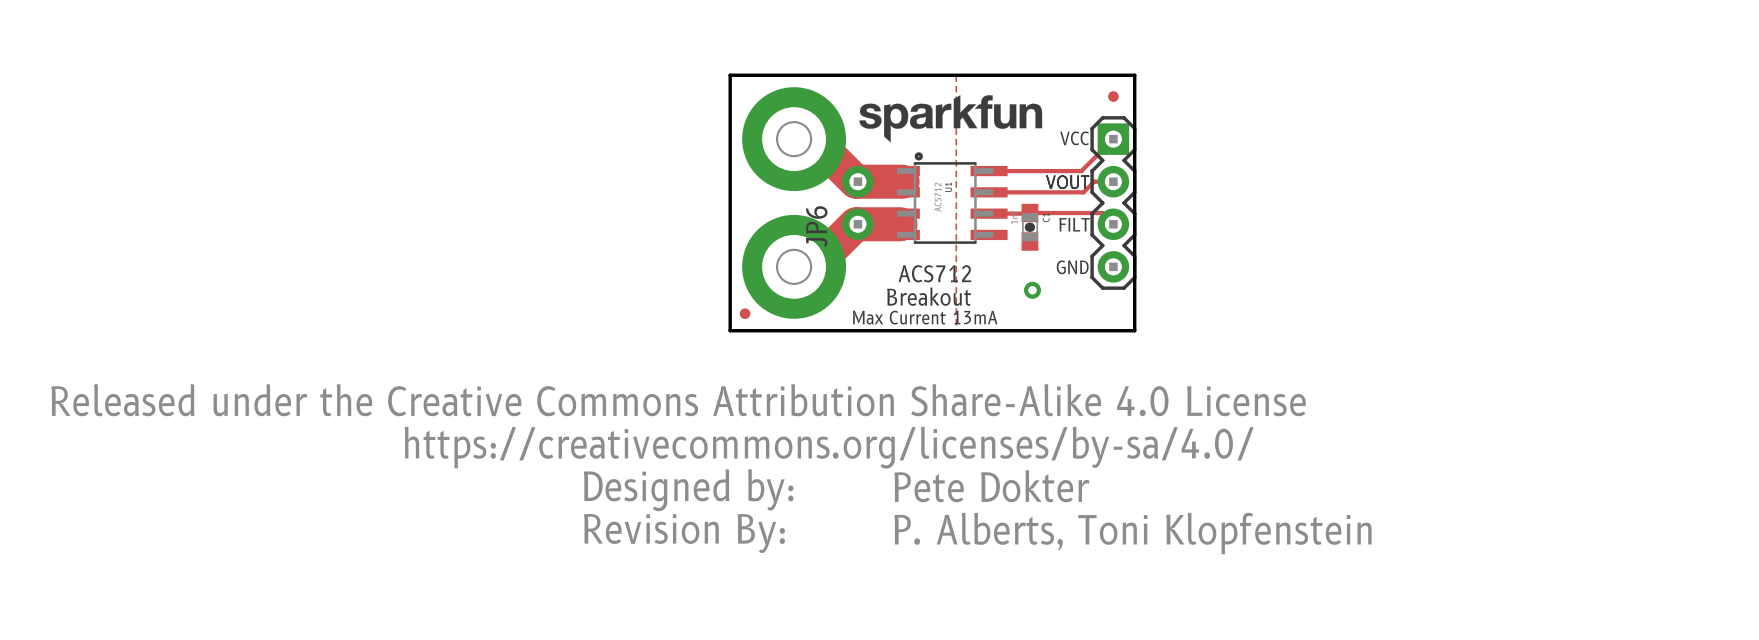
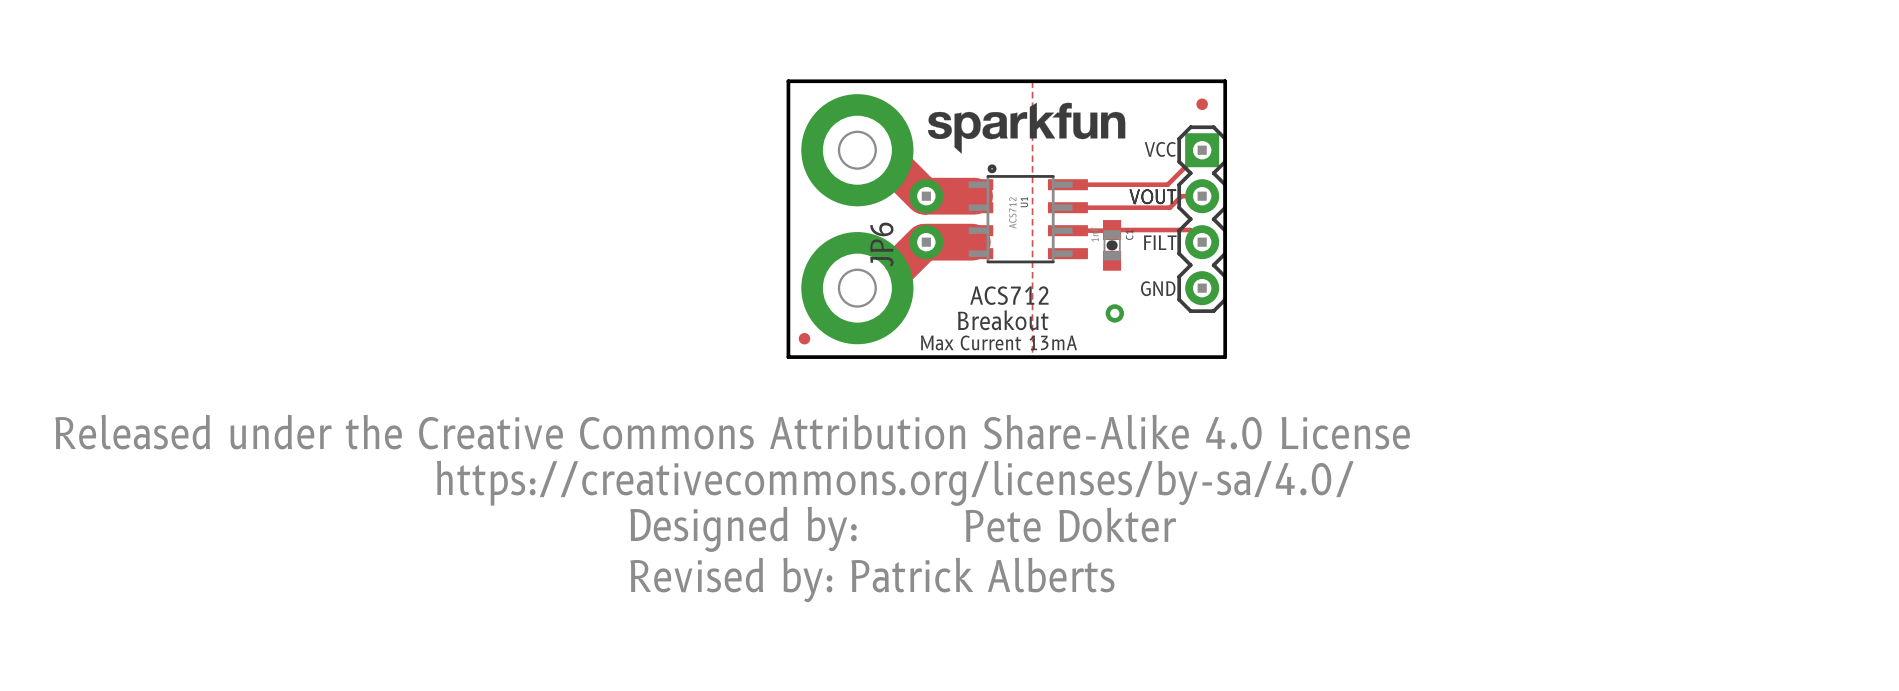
drawing: [583, 513, 785, 554] -> none
text: P. Alberts, Toni Klopfenstein (1132, 533) -> none
text: none -> Revised by: Patrick Alberts (872, 579)

